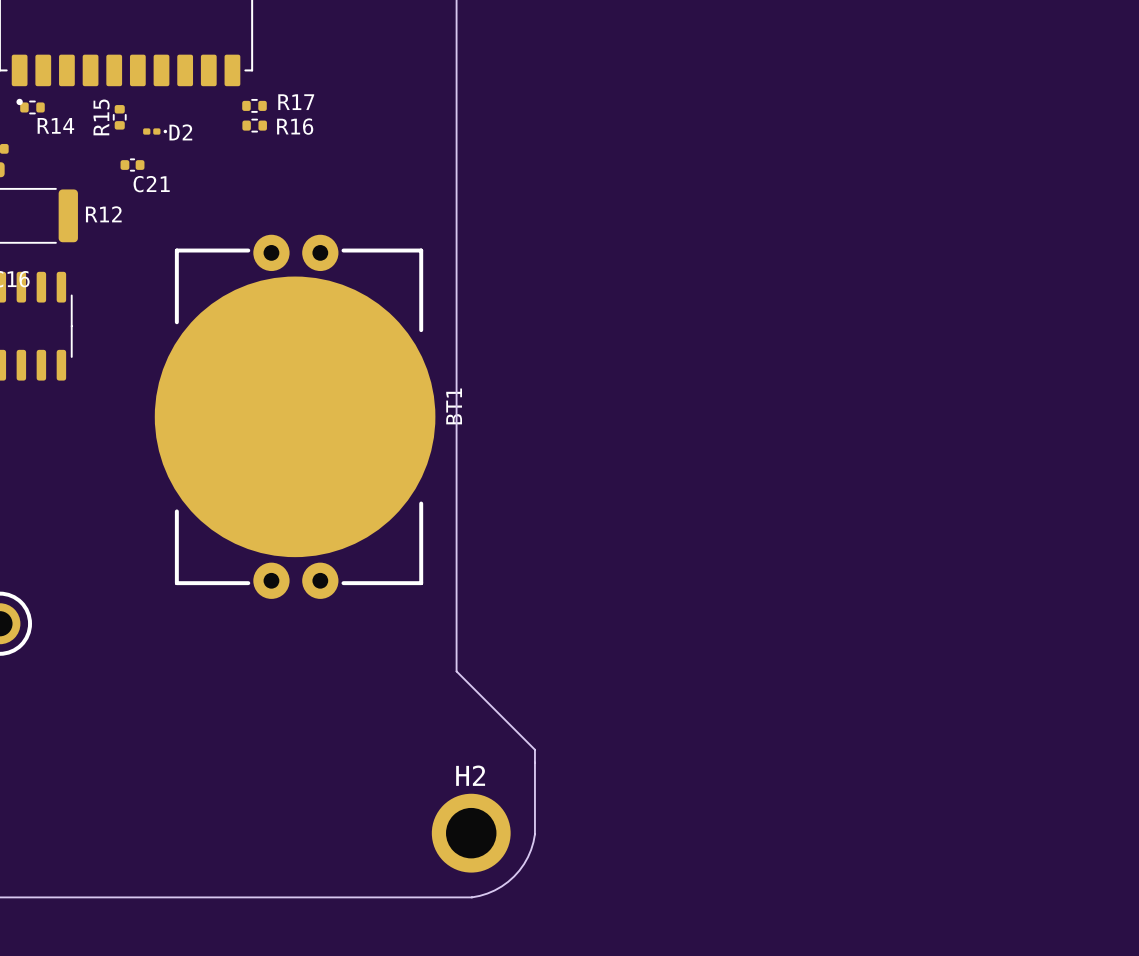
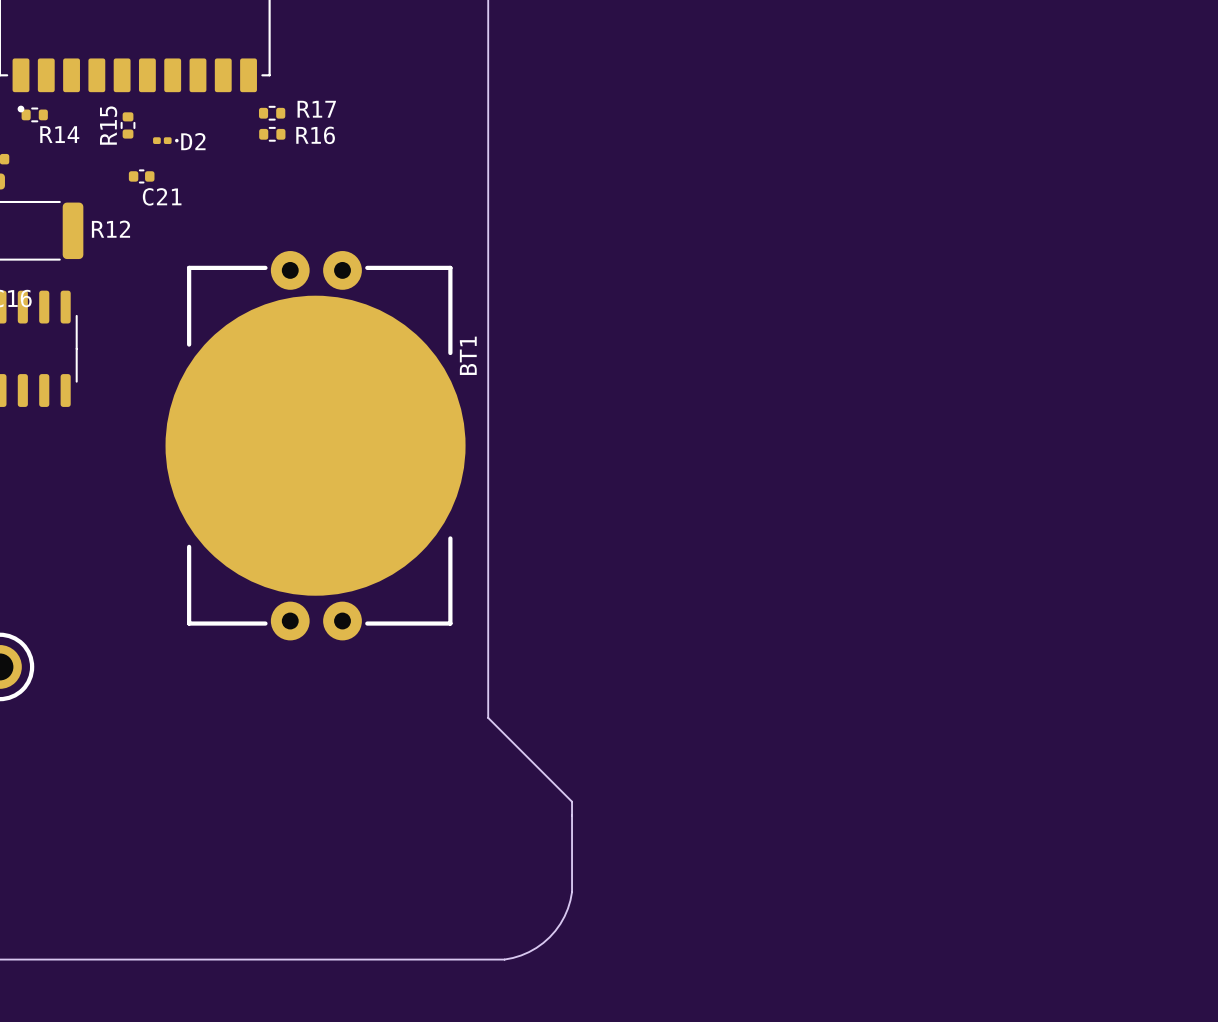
BT1 name position: BT1 (454, 406) -> BT1 (468, 355)
H2: (471, 833) -> none

